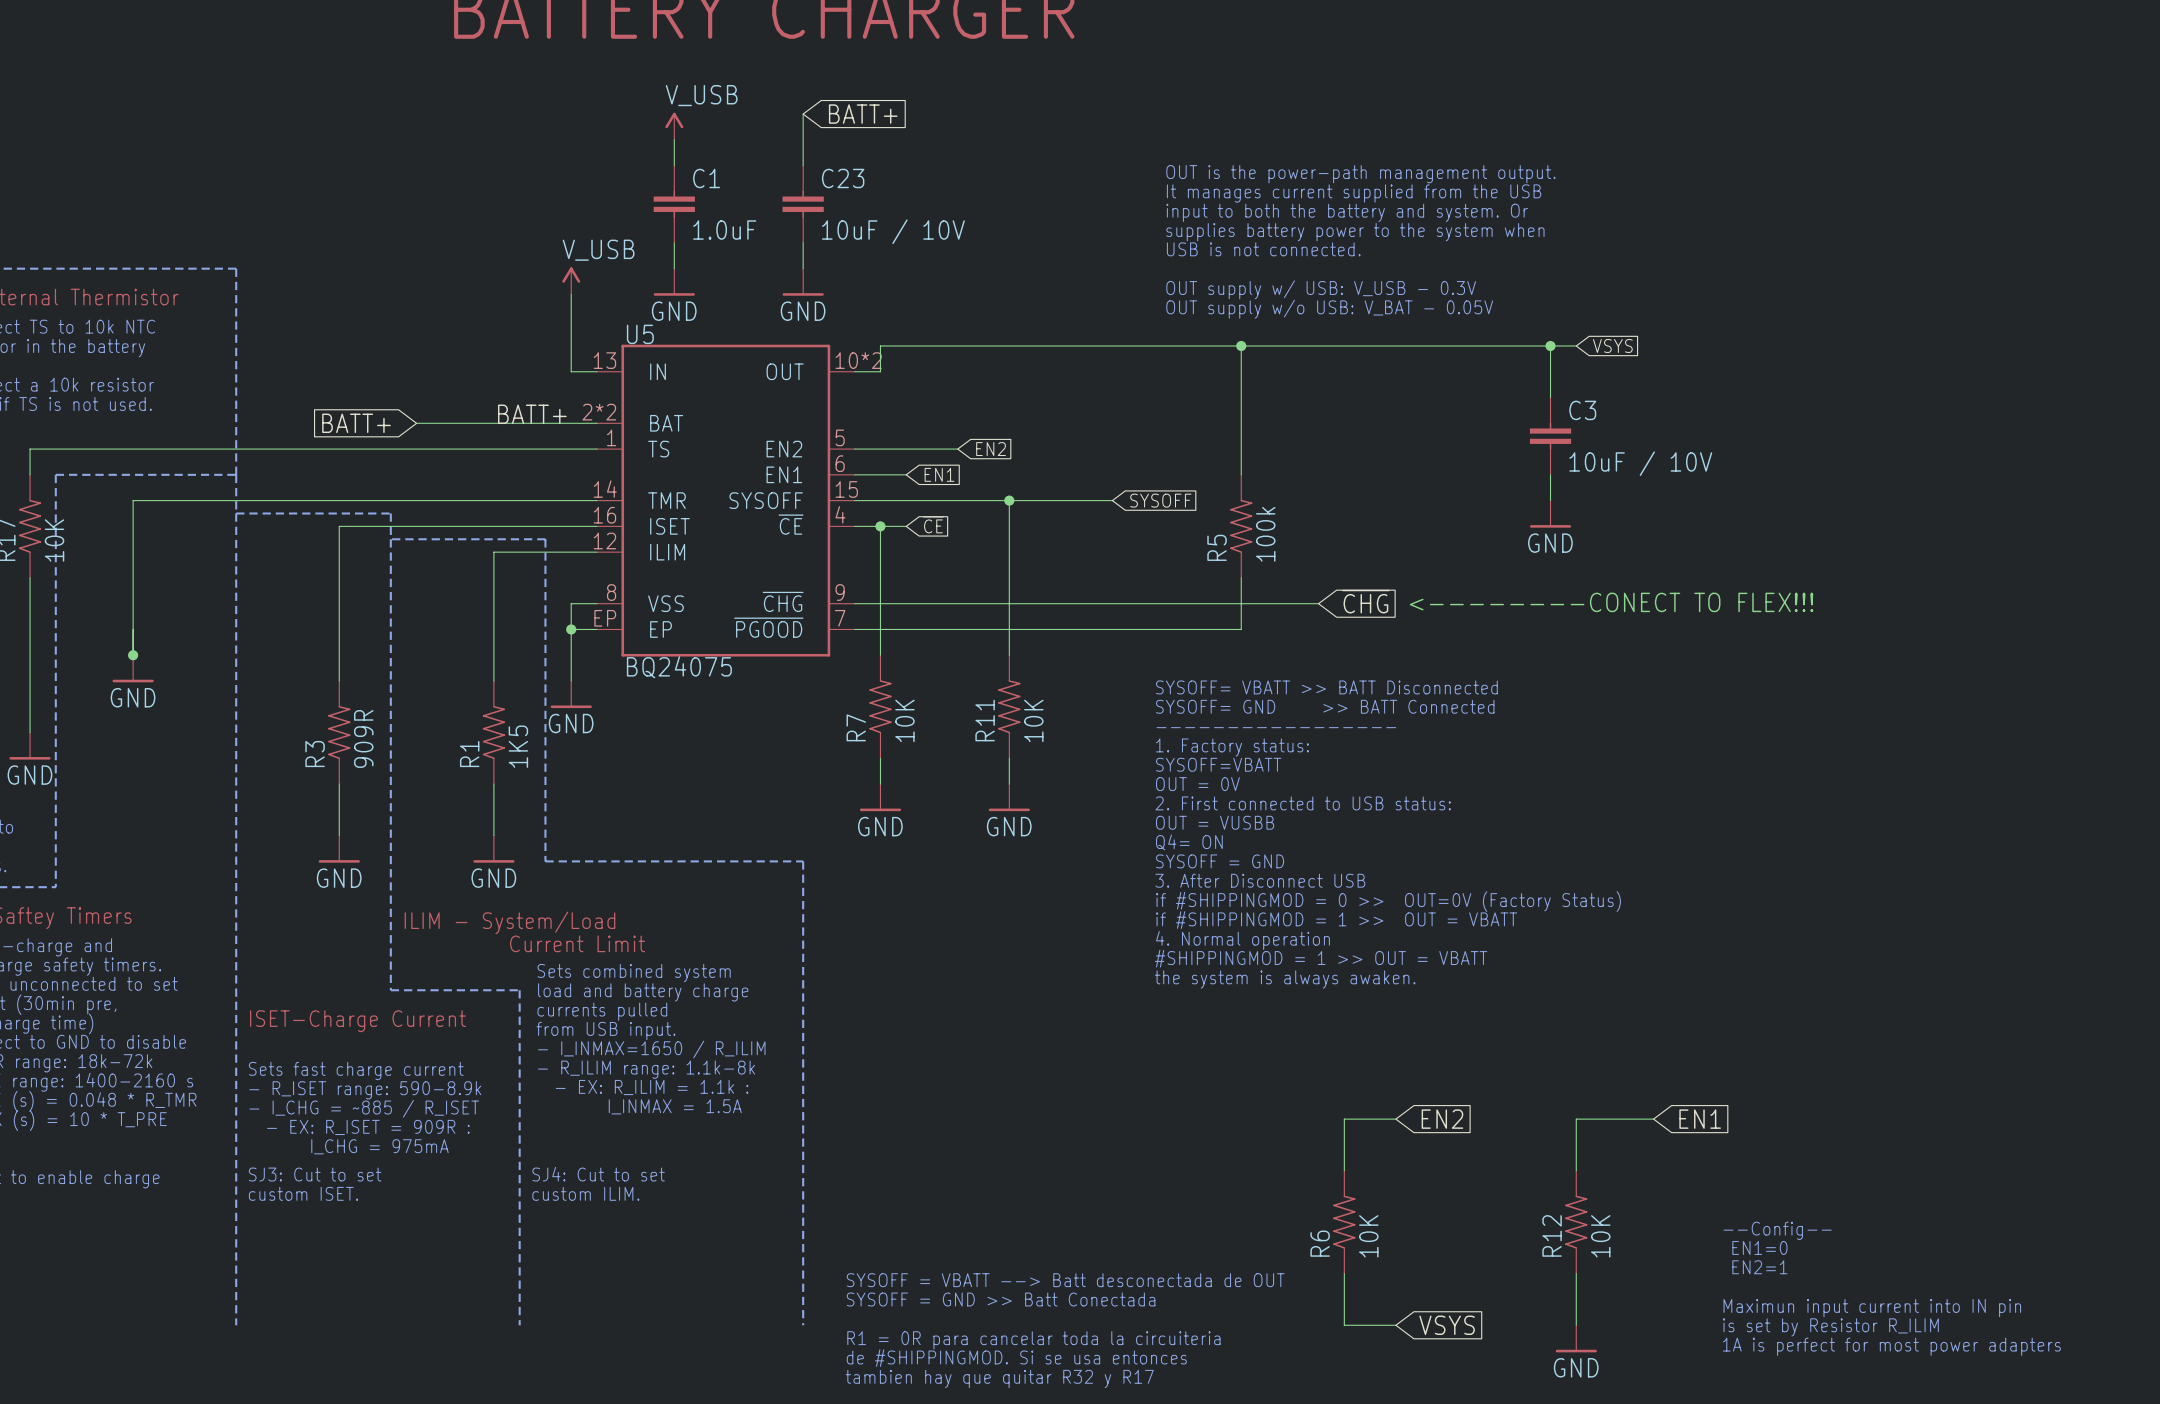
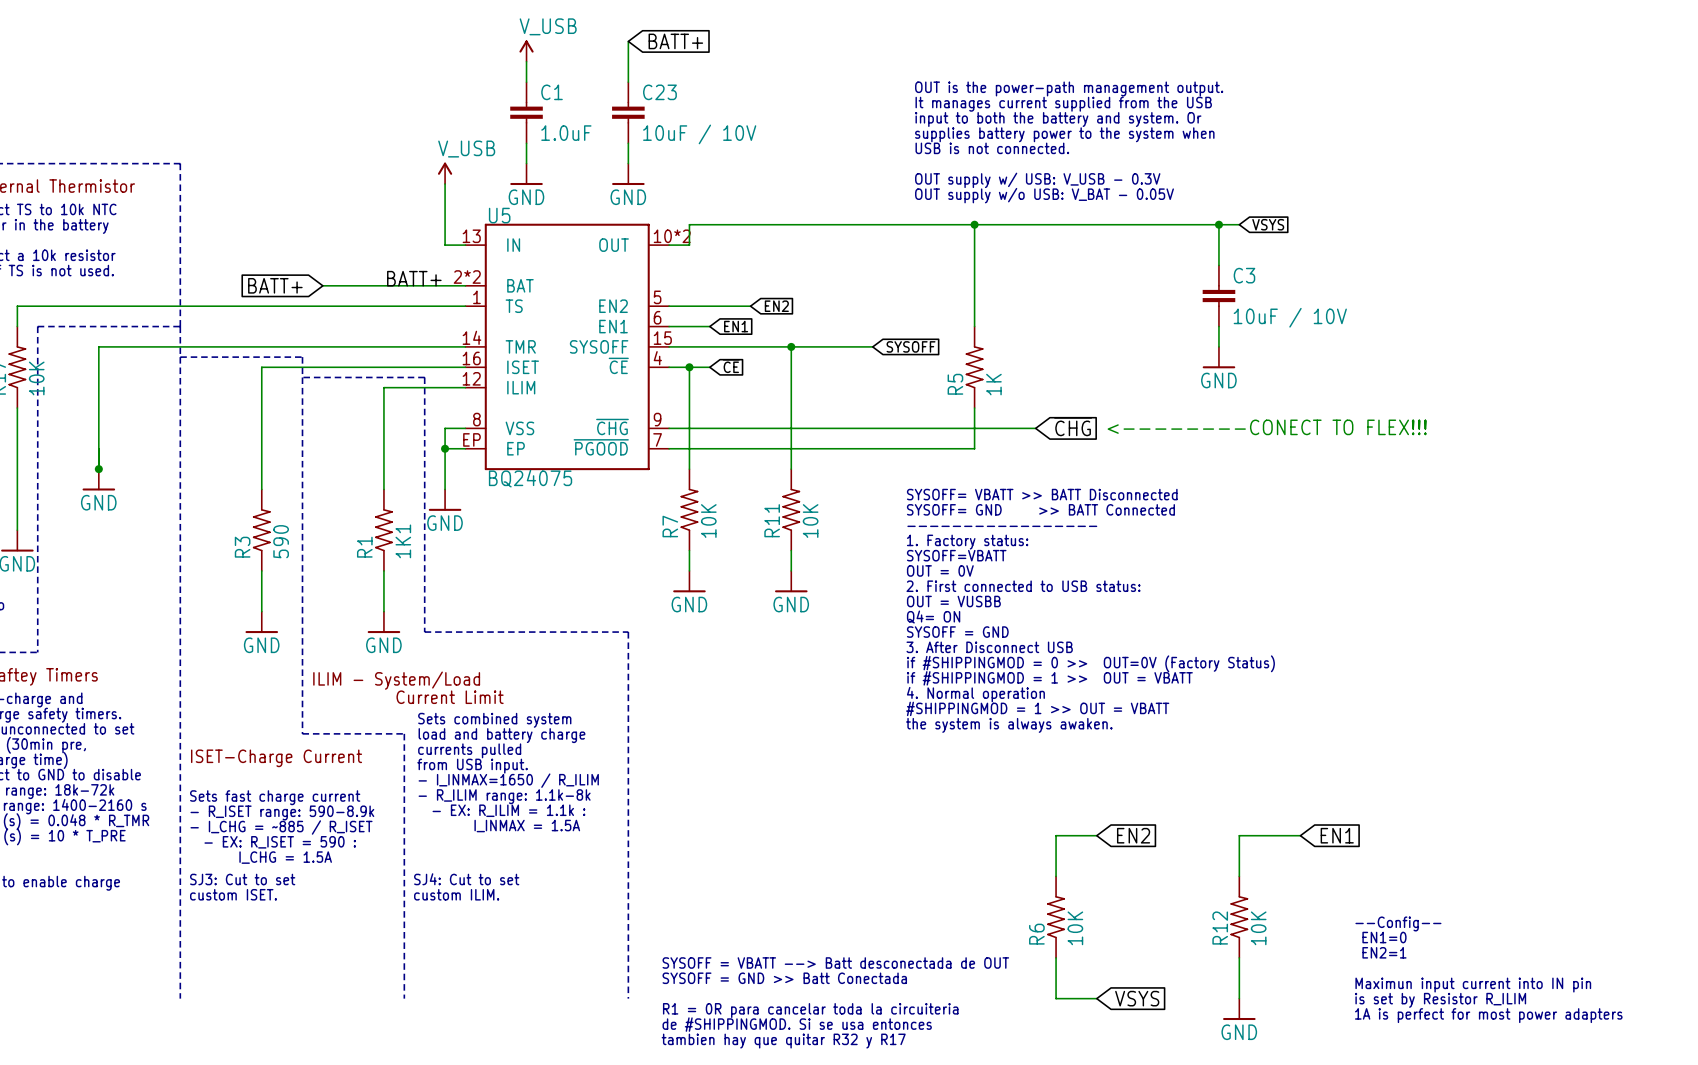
R5 value: 100k (1265, 534) -> 1K (993, 384)
R3 value: 909R (363, 738) -> 590 (281, 541)
R1 value: 1K5 (518, 746) -> 1K1 (403, 541)
text: - EX: R_ISET = 909R : (368, 1127) -> - EX: R_ISET = 590 : (280, 842)
text: I_CHG = 975mA (380, 1146) -> I_CHG = 1.5A (285, 857)

